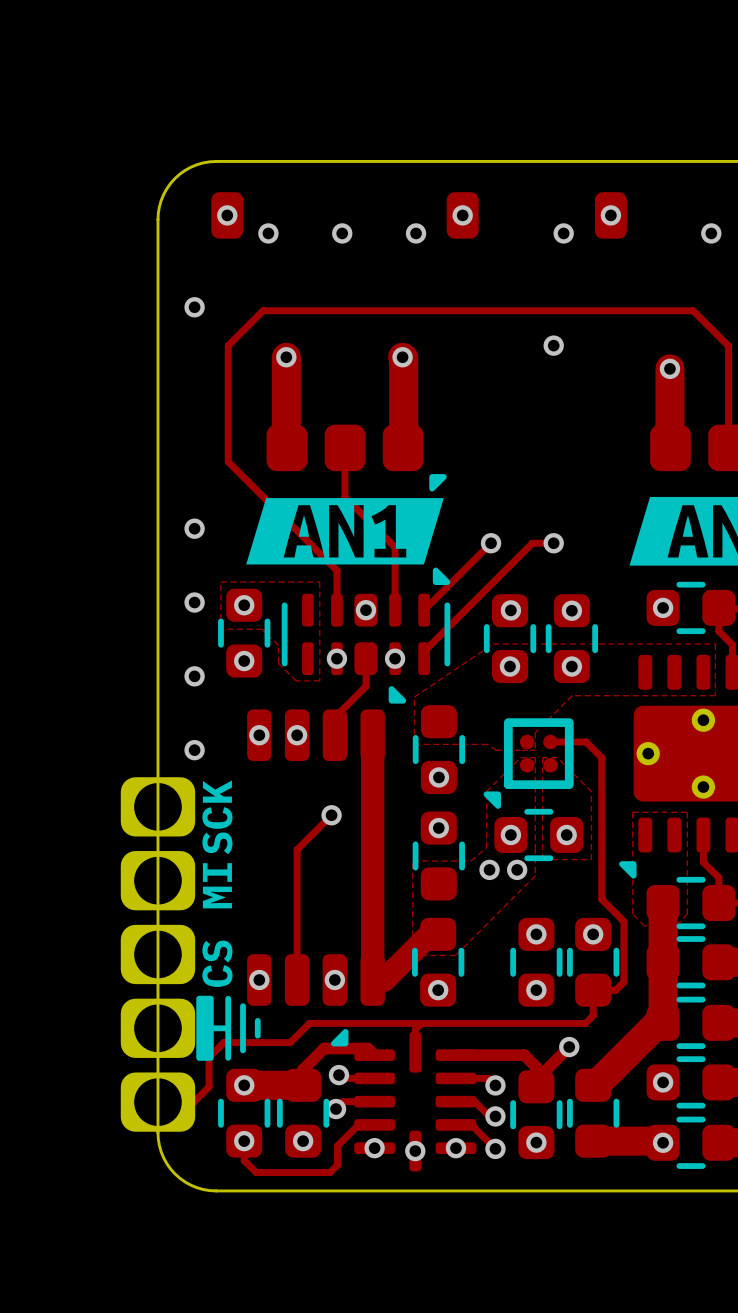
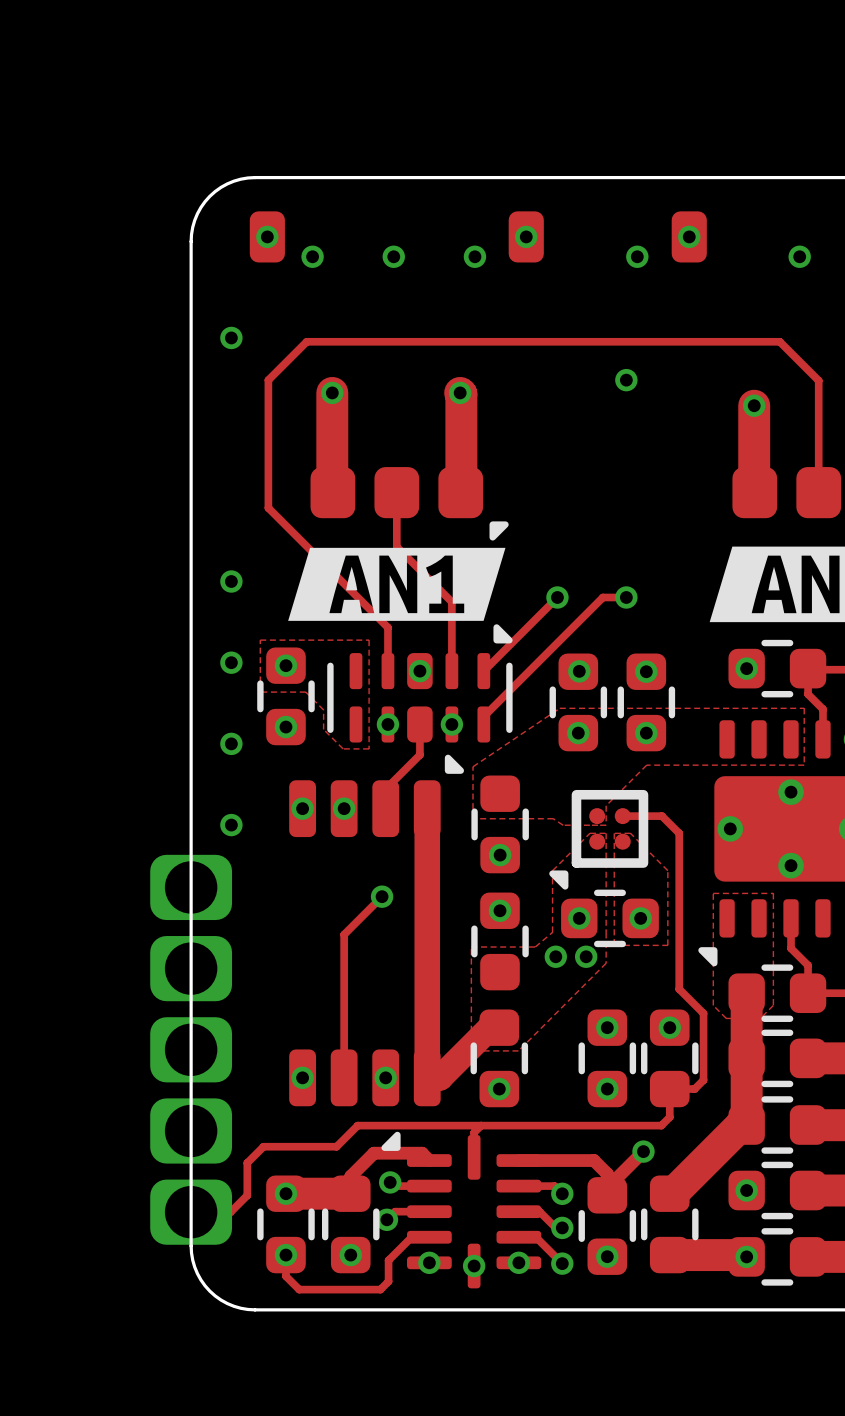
text: SCK (217, 817) -> none
text: MI (217, 885) -> none
text: CS (217, 963) -> none
drawing: [196, 995, 214, 1061] -> none
line: (228, 998) (228, 1057) -> none
line: (242, 1006) (242, 1050) -> none
line: (257, 1020) (257, 1035) -> none
line: (213, 1028) (228, 1028) -> none

